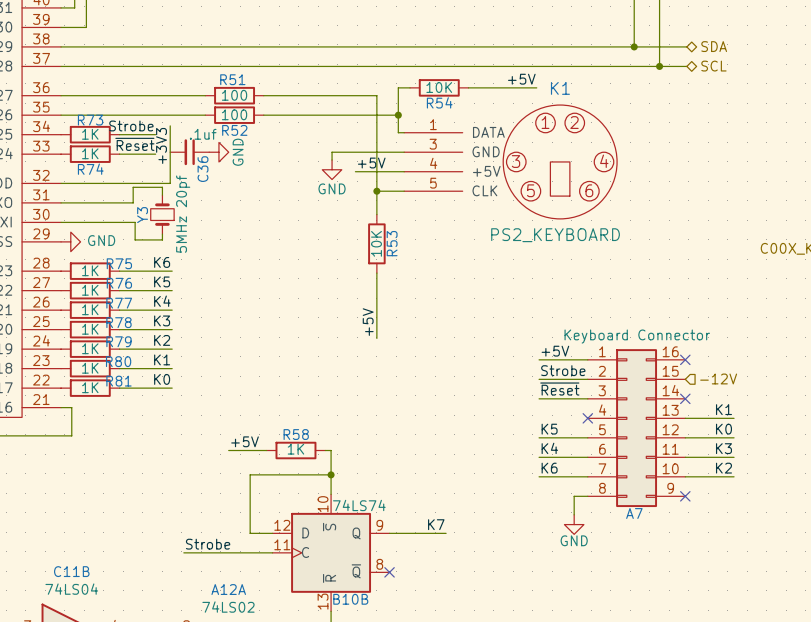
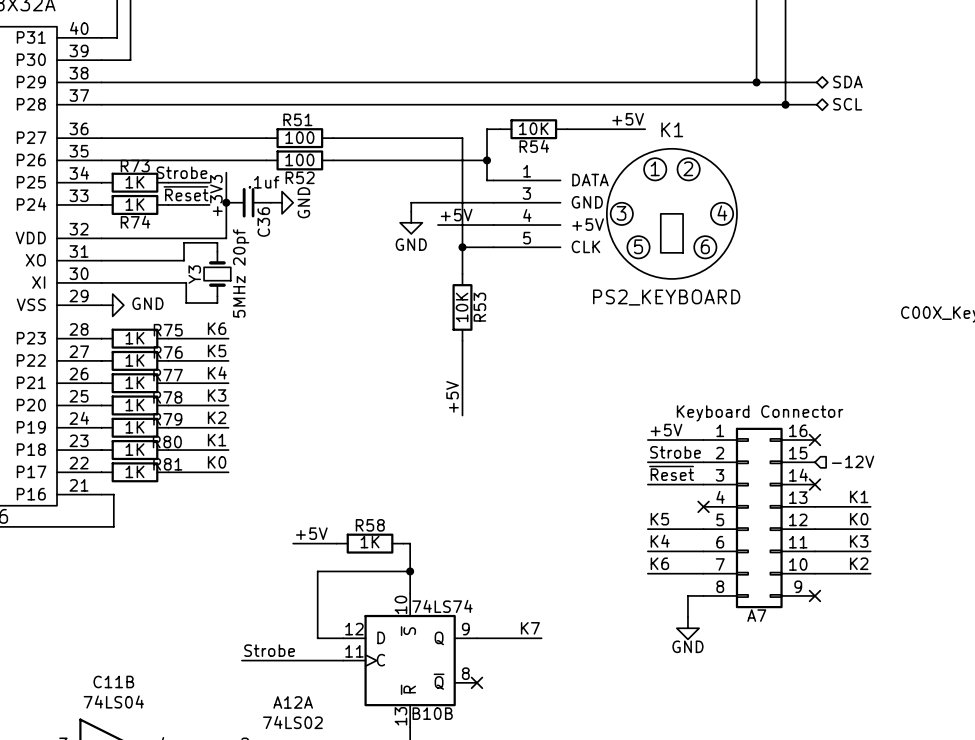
junction: none -> (226, 202)

